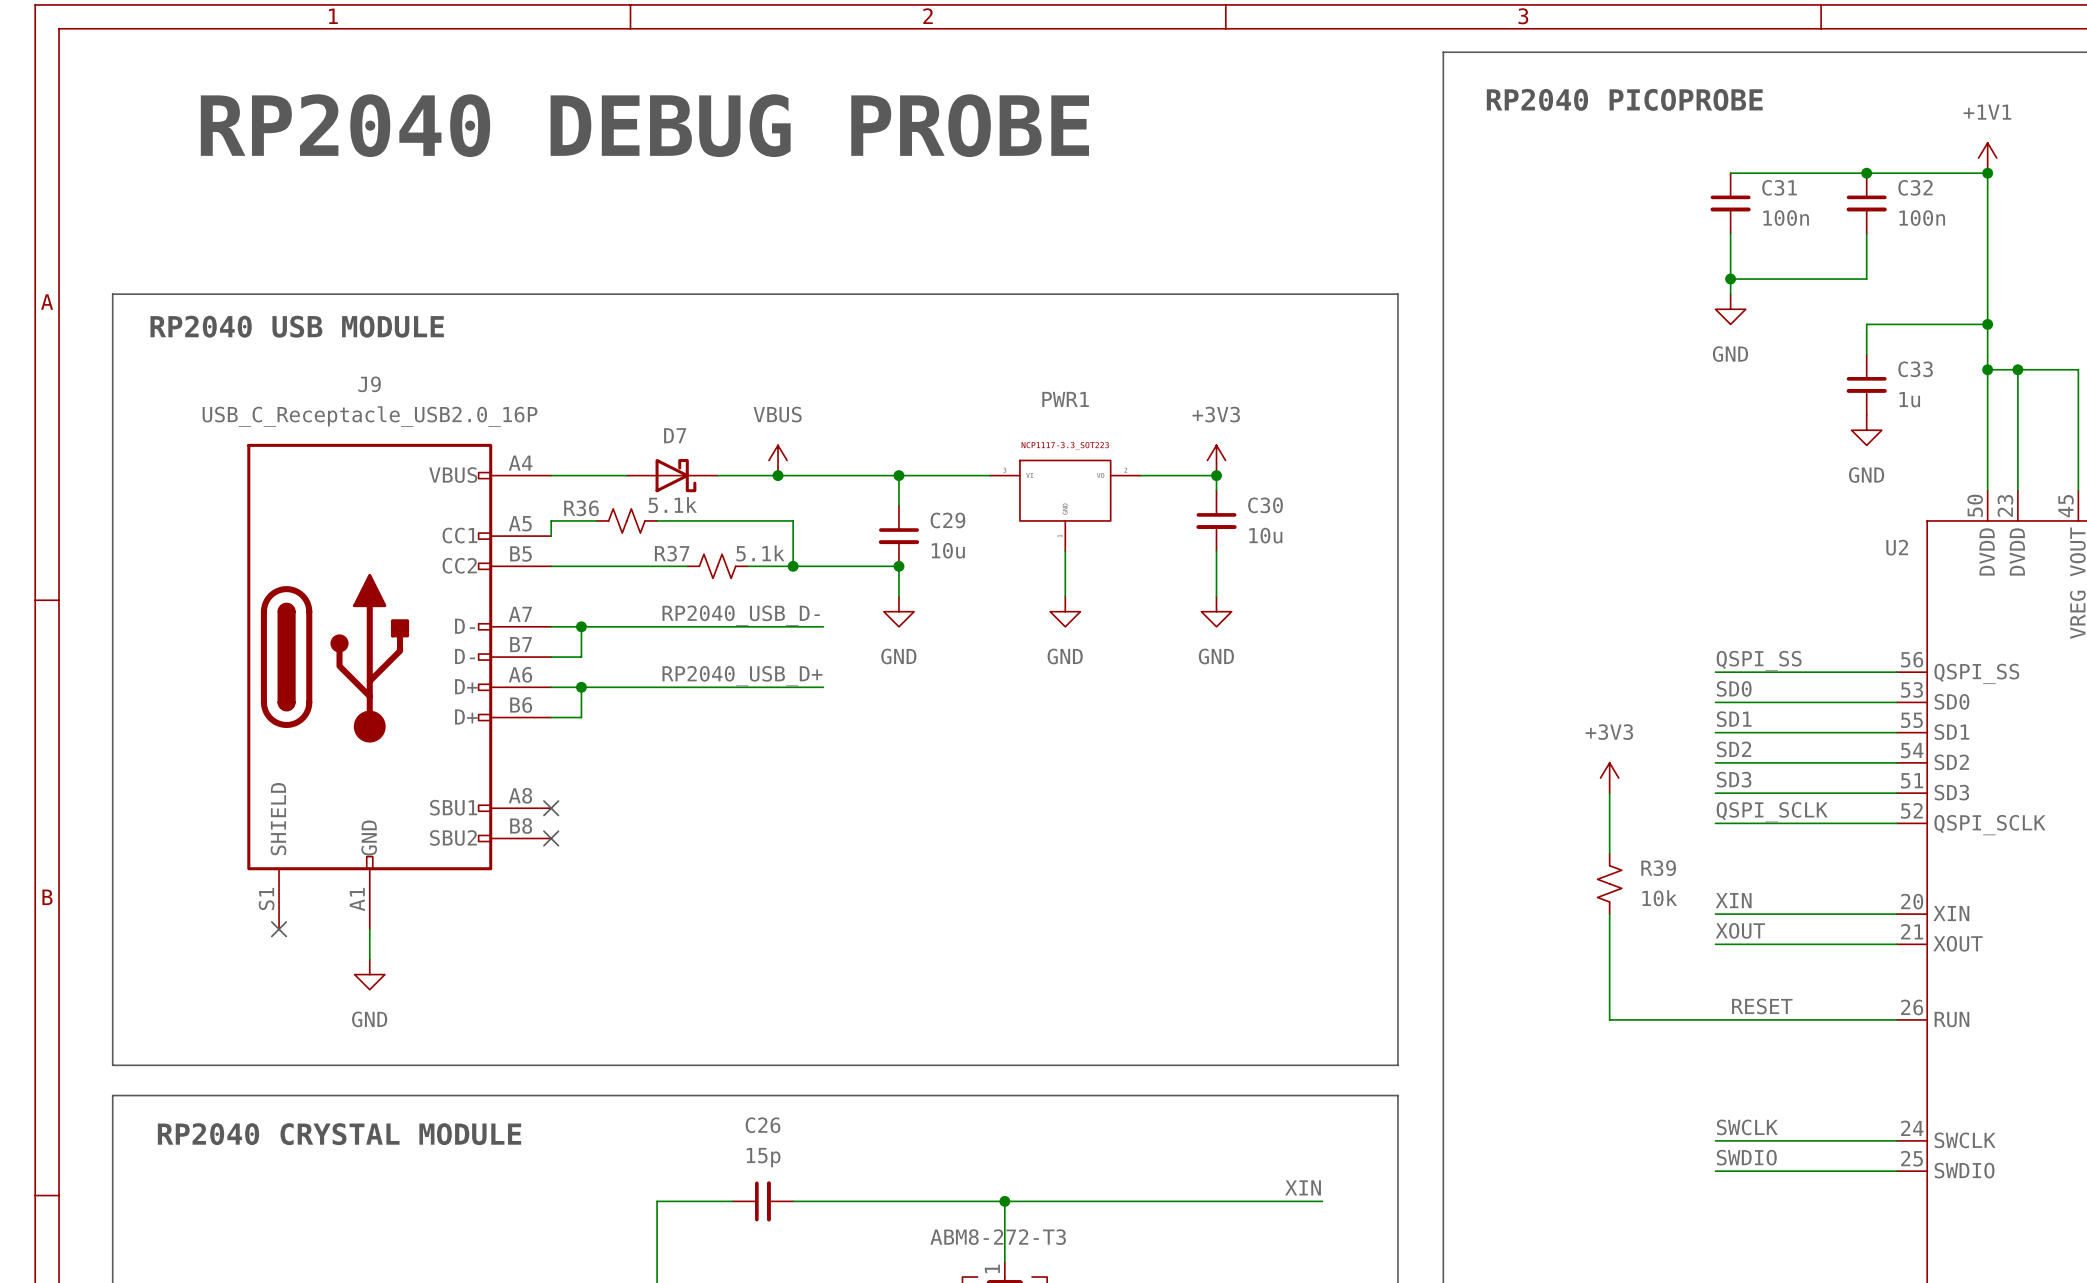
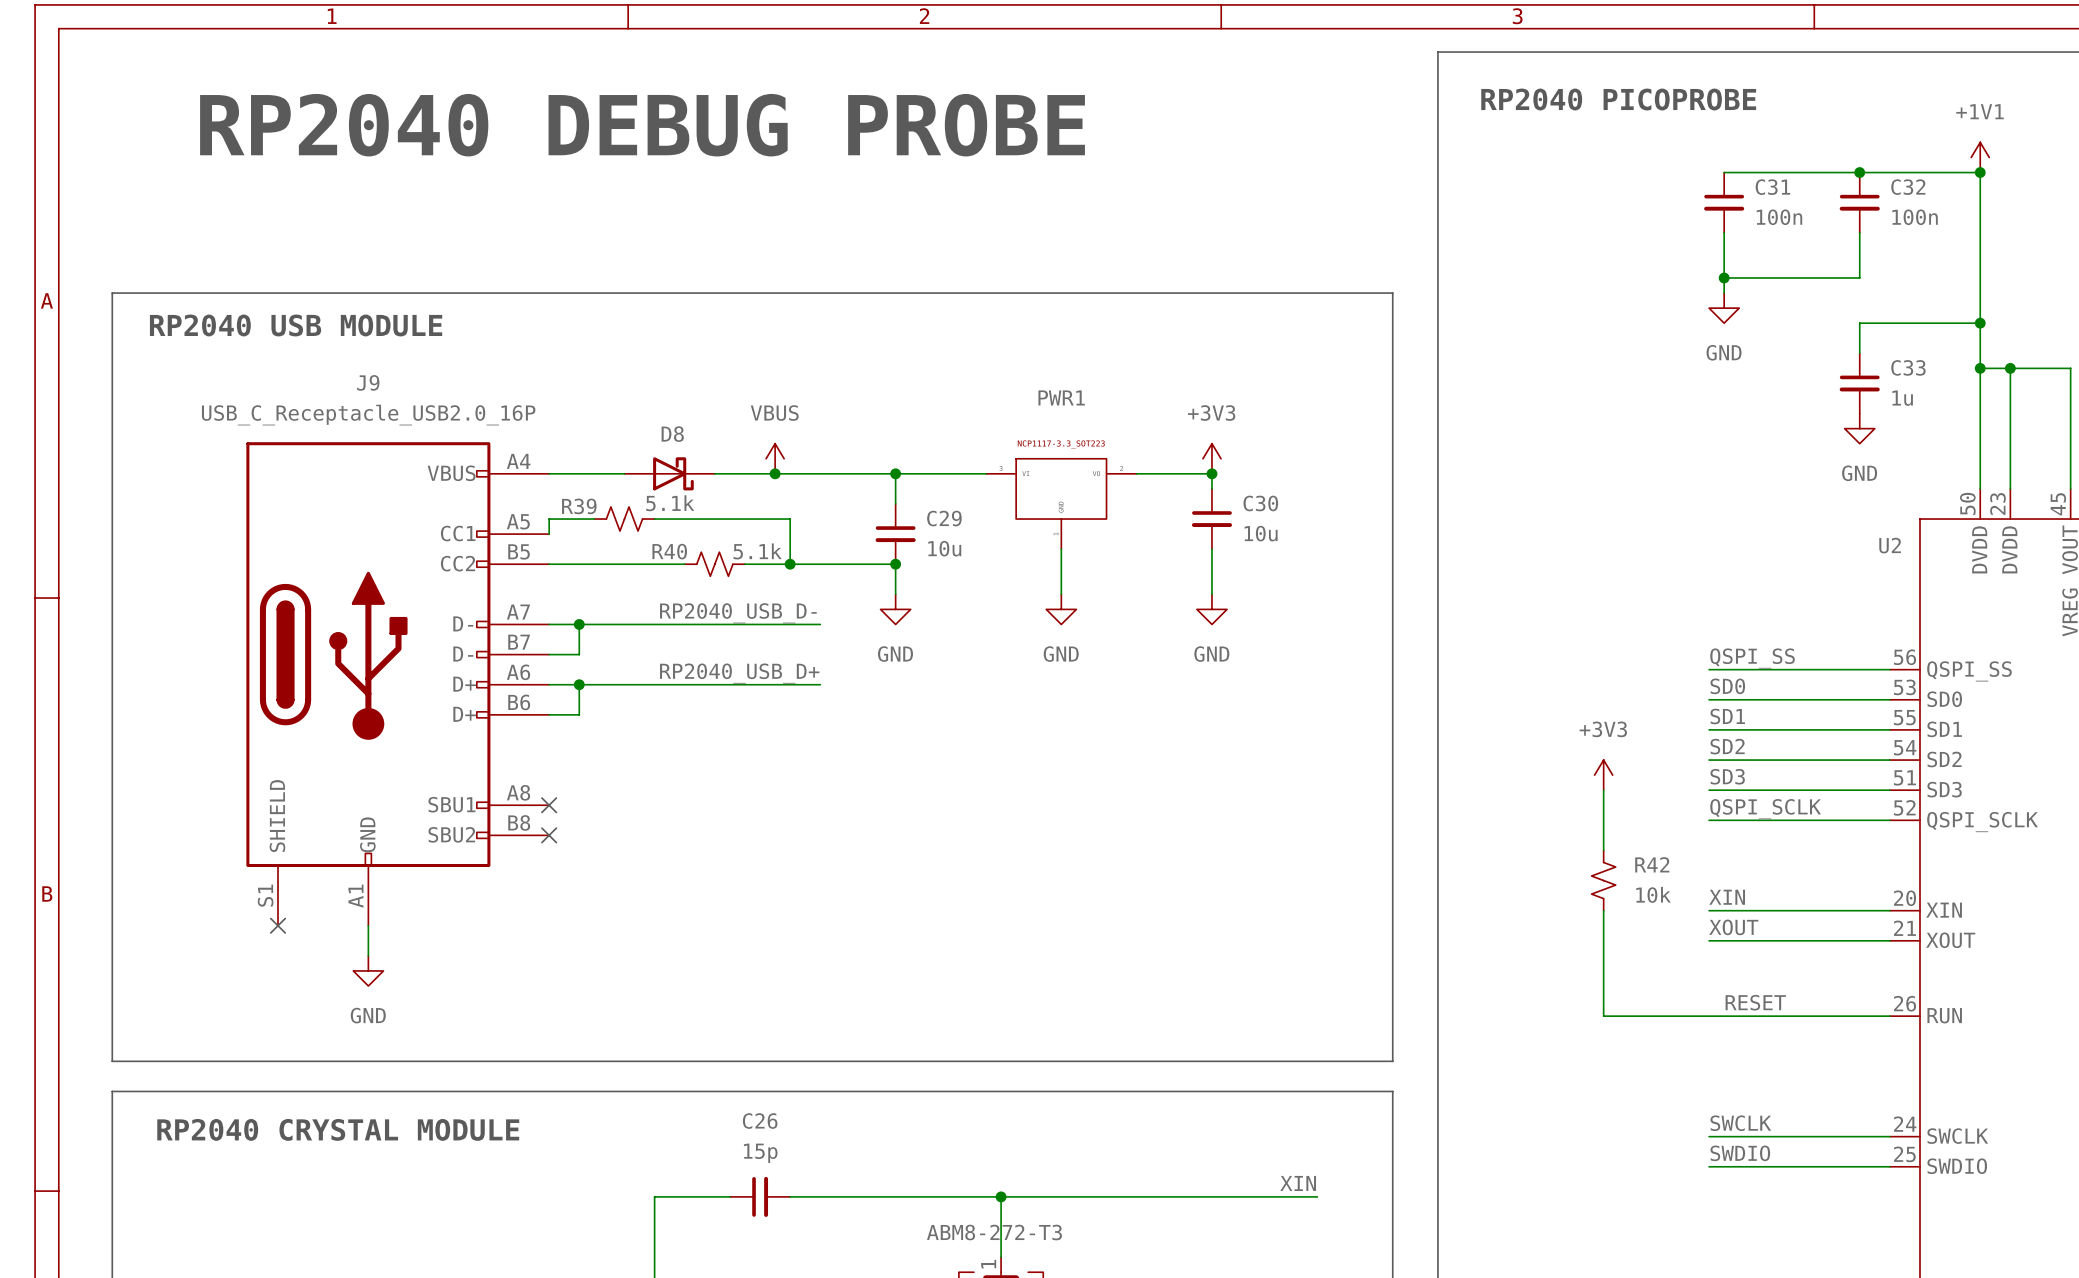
D7 name: D7 (675, 435) -> D8 (672, 434)
R36 name: R36 (581, 508) -> R39 (579, 506)
R37 name: R37 (672, 553) -> R40 (669, 551)
R39 name: R39 (1658, 868) -> R42 (1652, 864)

